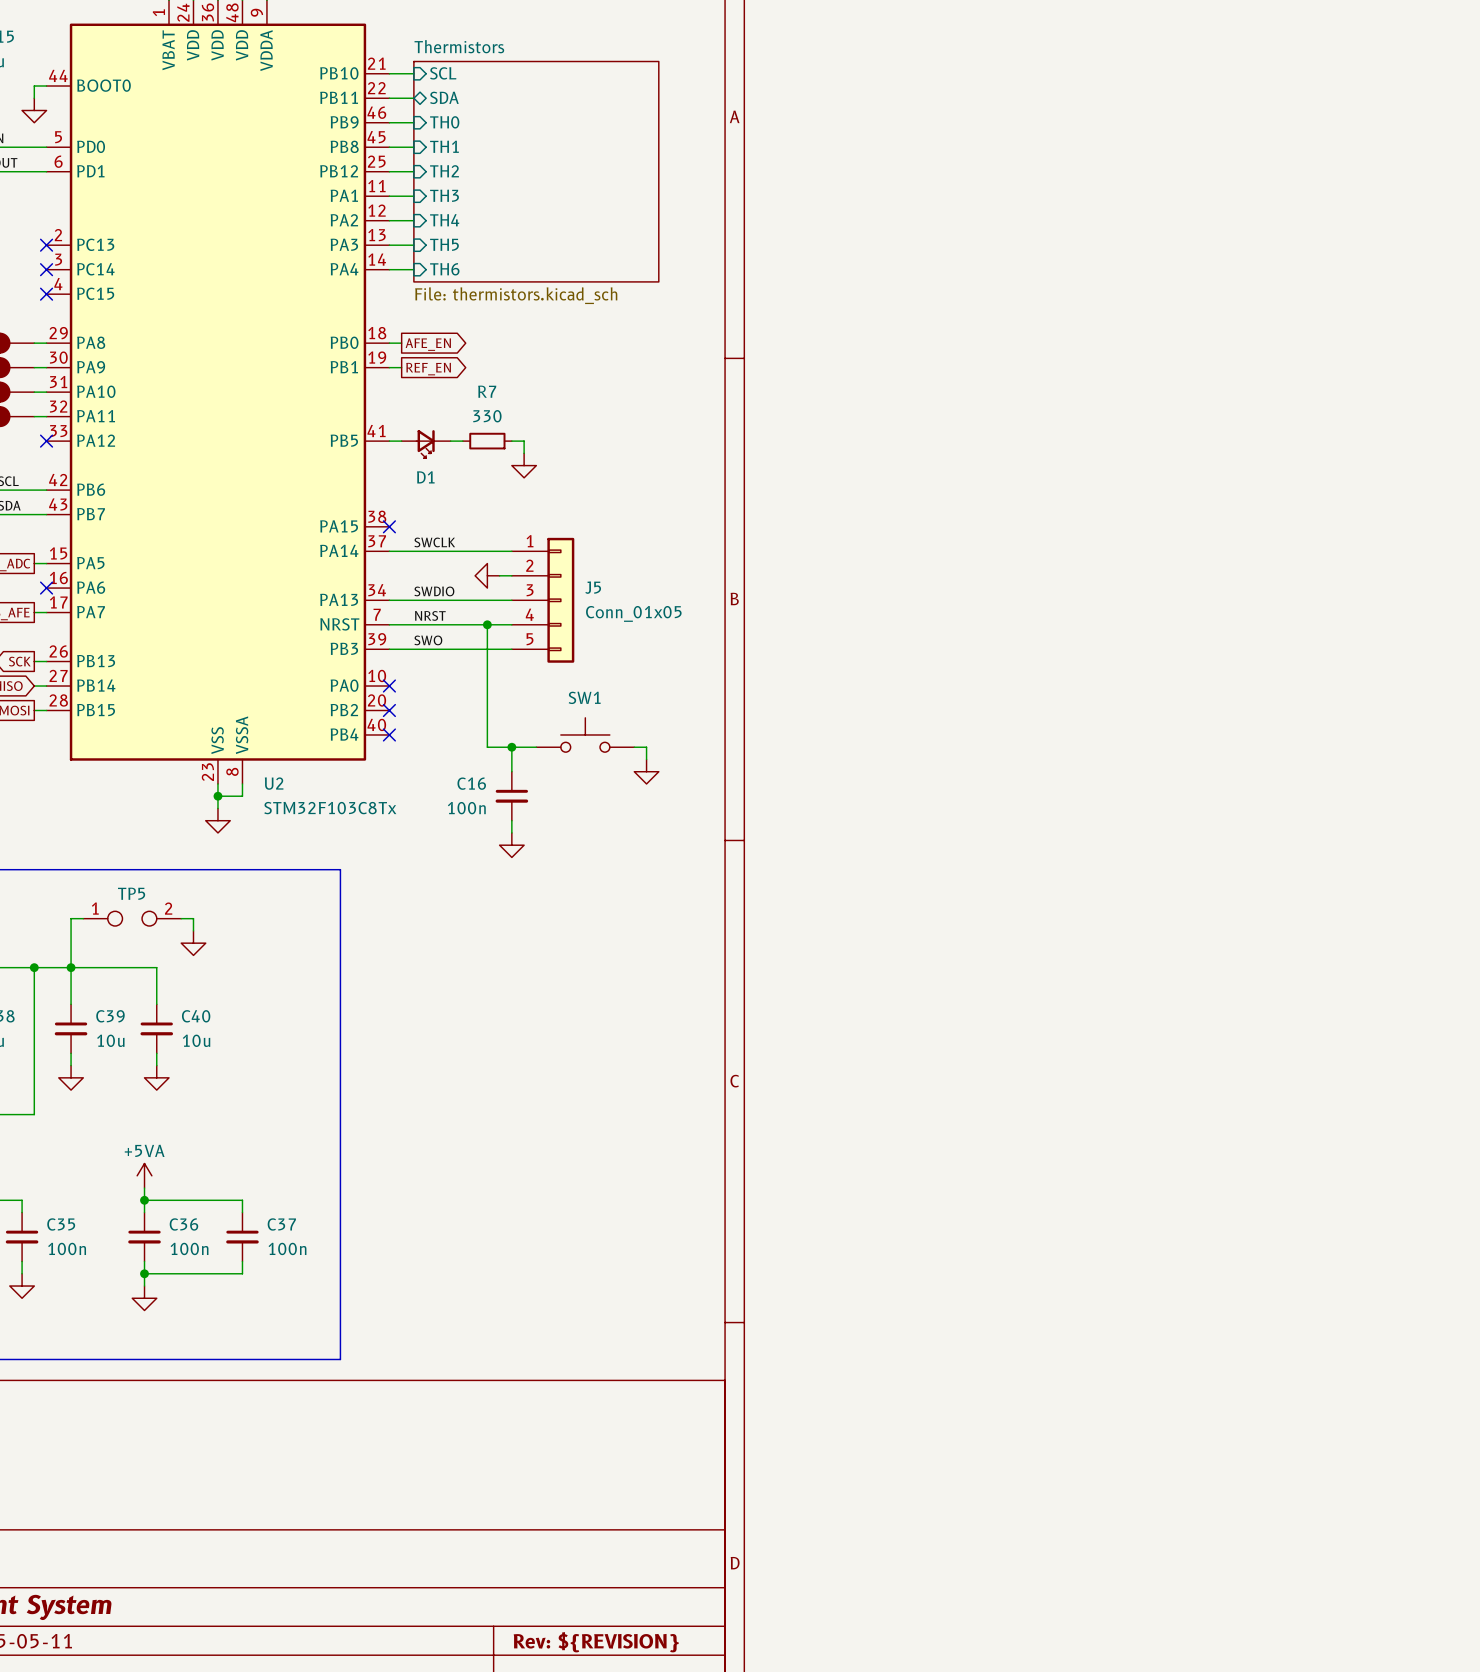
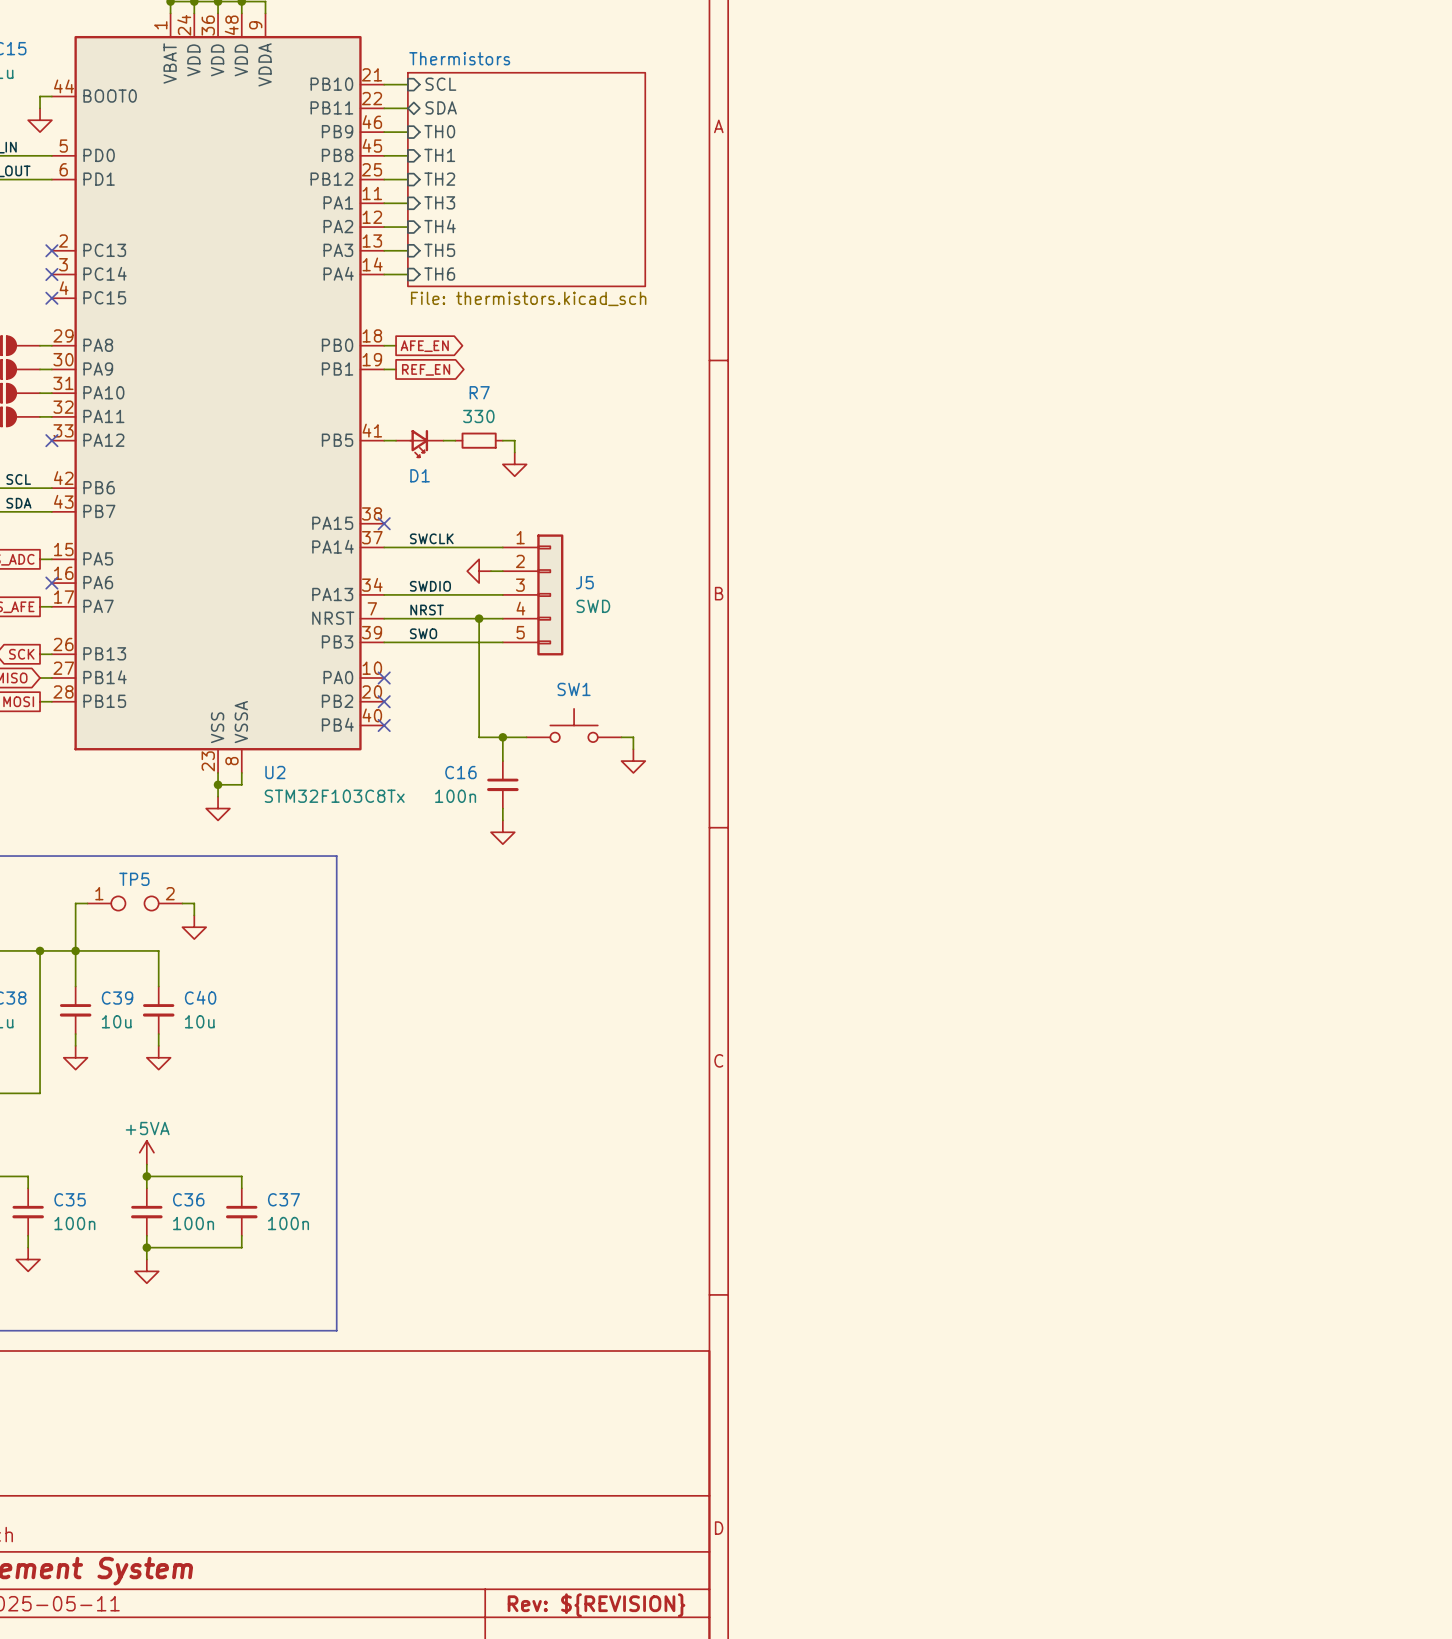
J5 value: Conn_01x05 (633, 613) -> SWD (593, 606)

